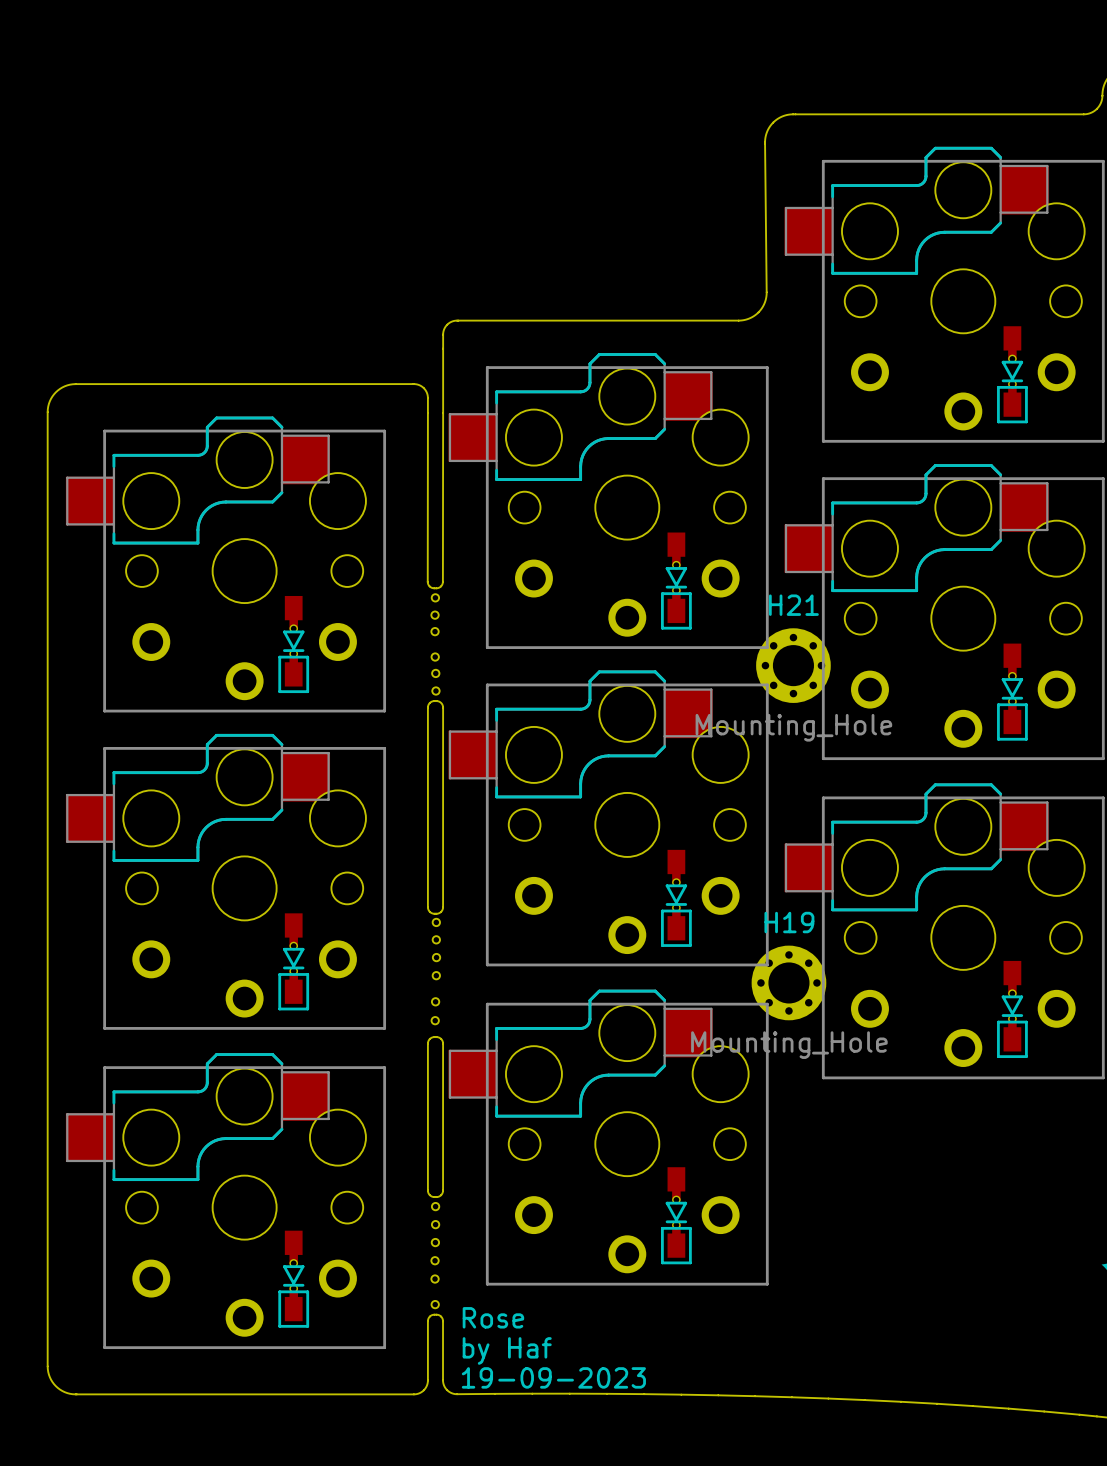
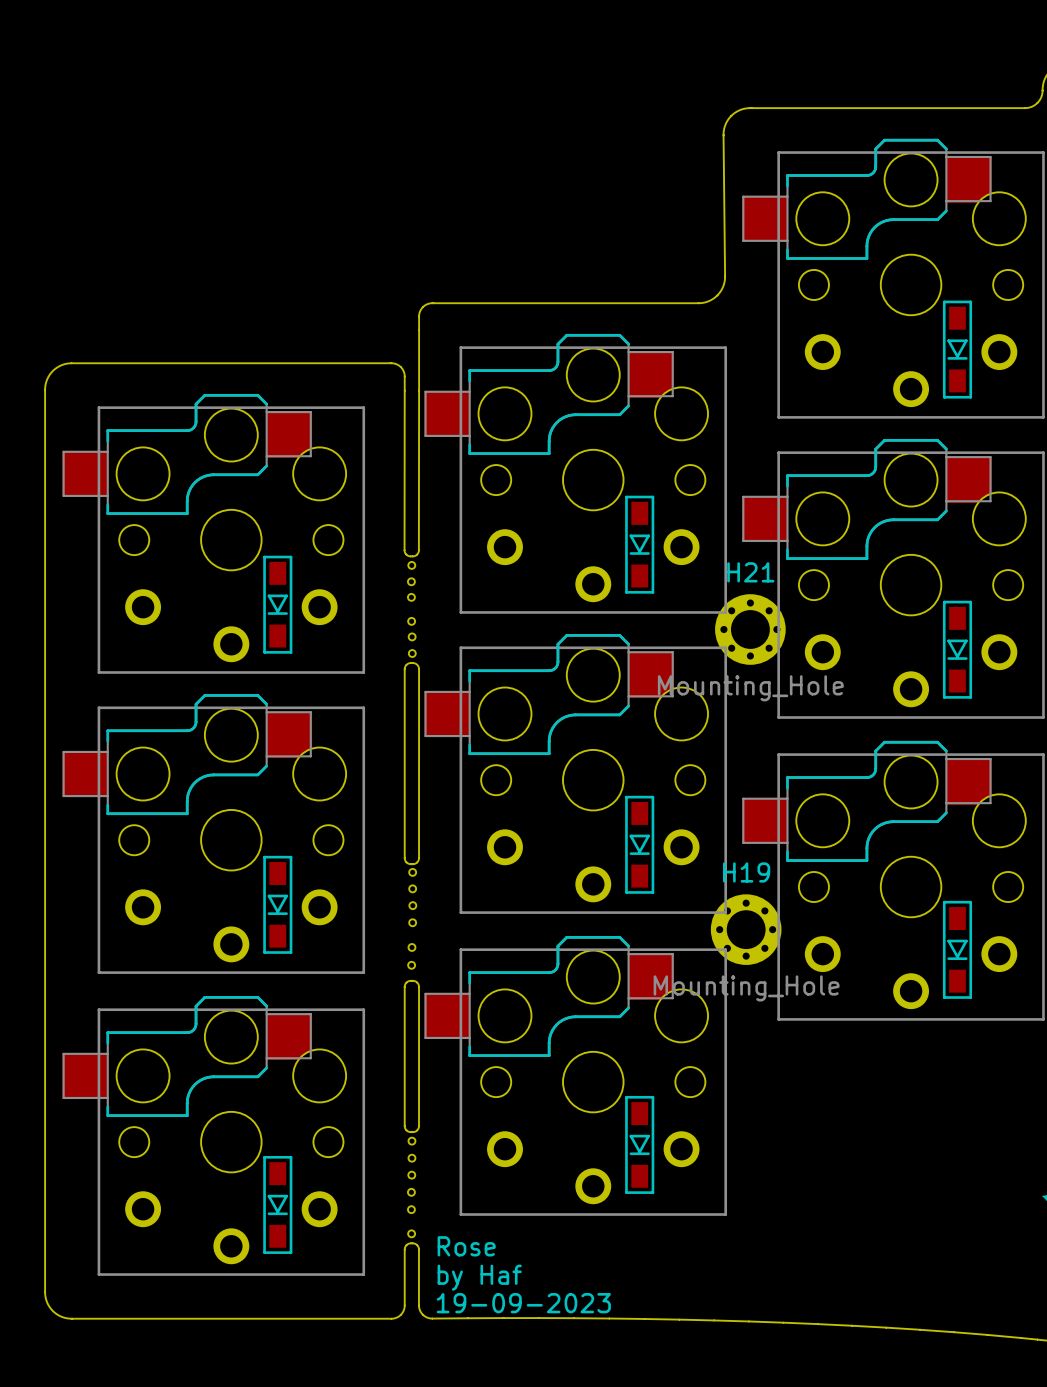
part footprint: [997, 326, 1028, 424] -> [942, 300, 973, 399]
part footprint: [661, 532, 692, 630] -> [625, 495, 655, 594]
part footprint: [278, 595, 310, 694] -> [263, 555, 293, 654]
part footprint: [997, 643, 1028, 741] -> [942, 600, 973, 699]
part footprint: [661, 849, 692, 947] -> [625, 795, 655, 894]
part footprint: [278, 913, 310, 1011] -> [263, 855, 293, 954]
part footprint: [997, 960, 1028, 1059] -> [942, 900, 973, 999]
part footprint: [661, 1167, 692, 1265] -> [625, 1095, 655, 1194]
part footprint: [278, 1230, 310, 1328] -> [263, 1155, 293, 1254]

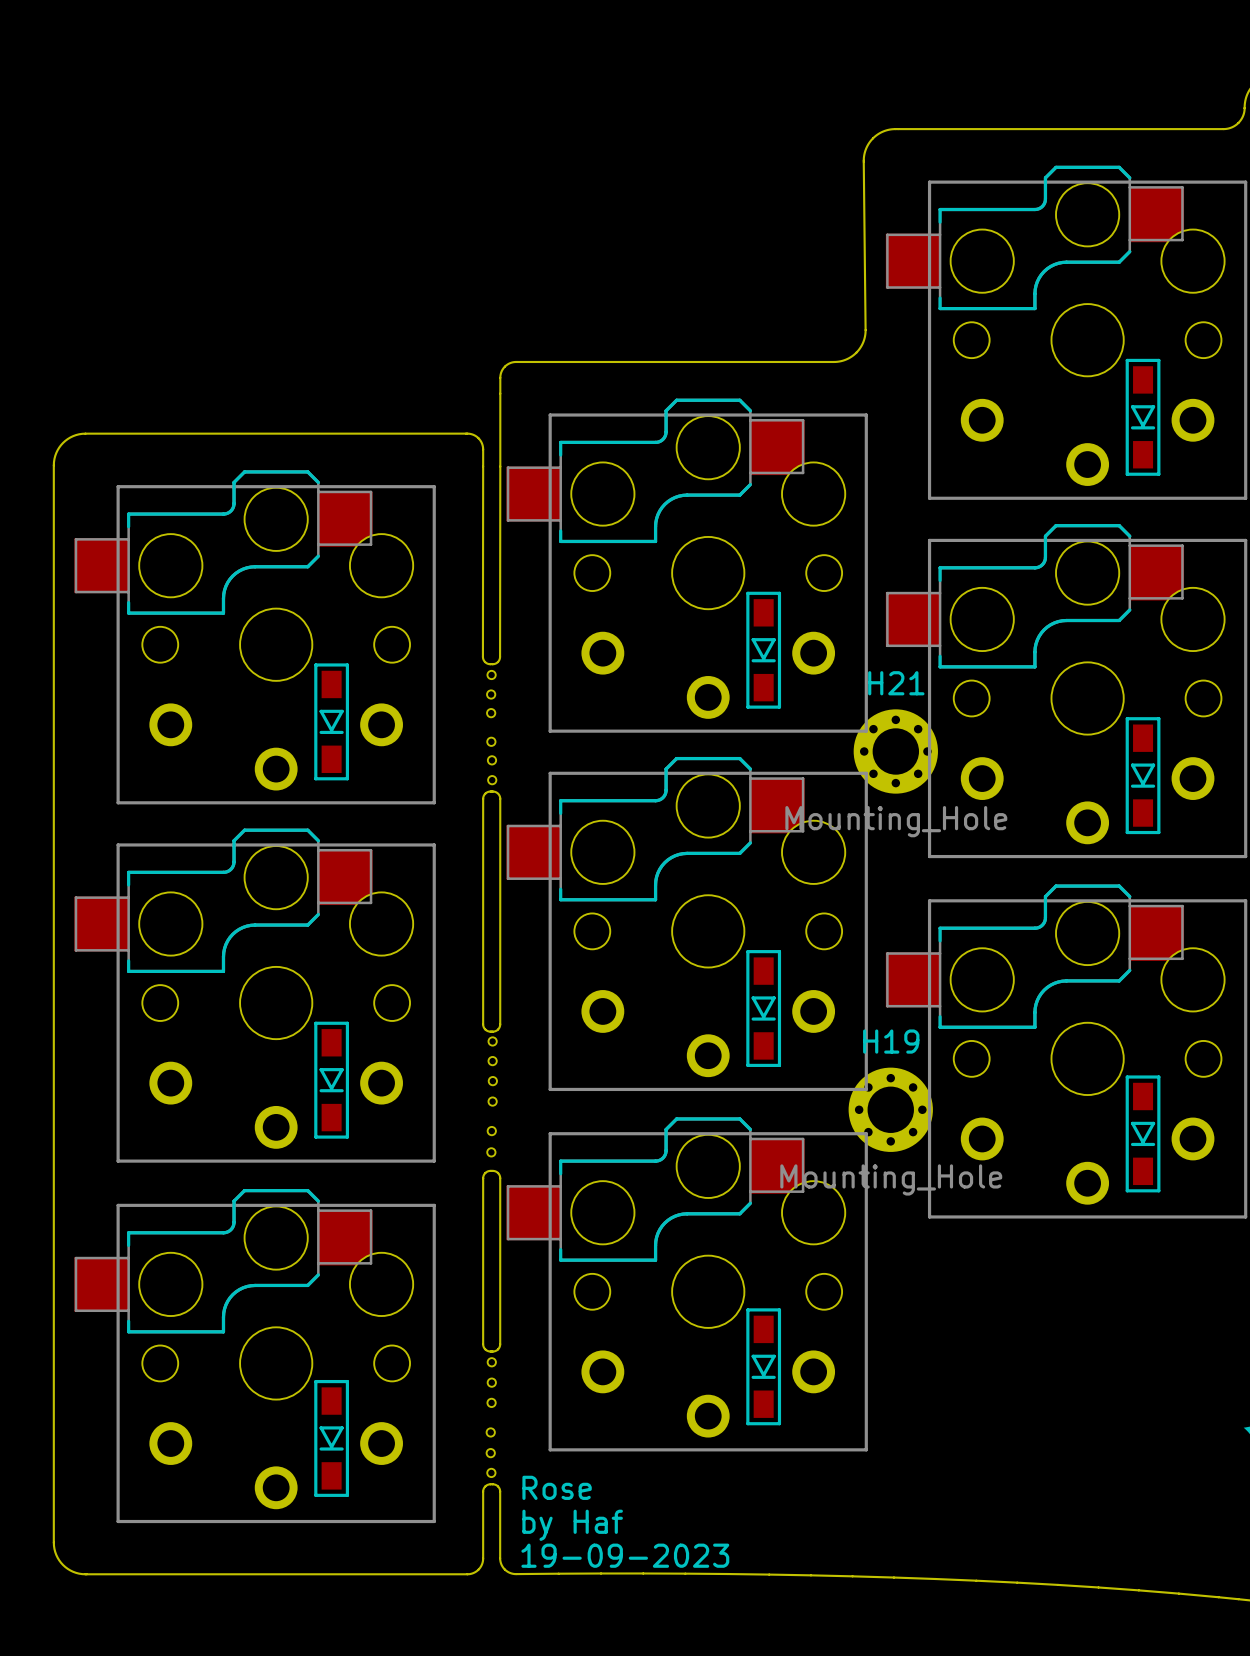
part: (411, 1192) -> none
part: none -> (490, 1432)
part: (411, 1209) -> none
part: none -> (490, 1453)

